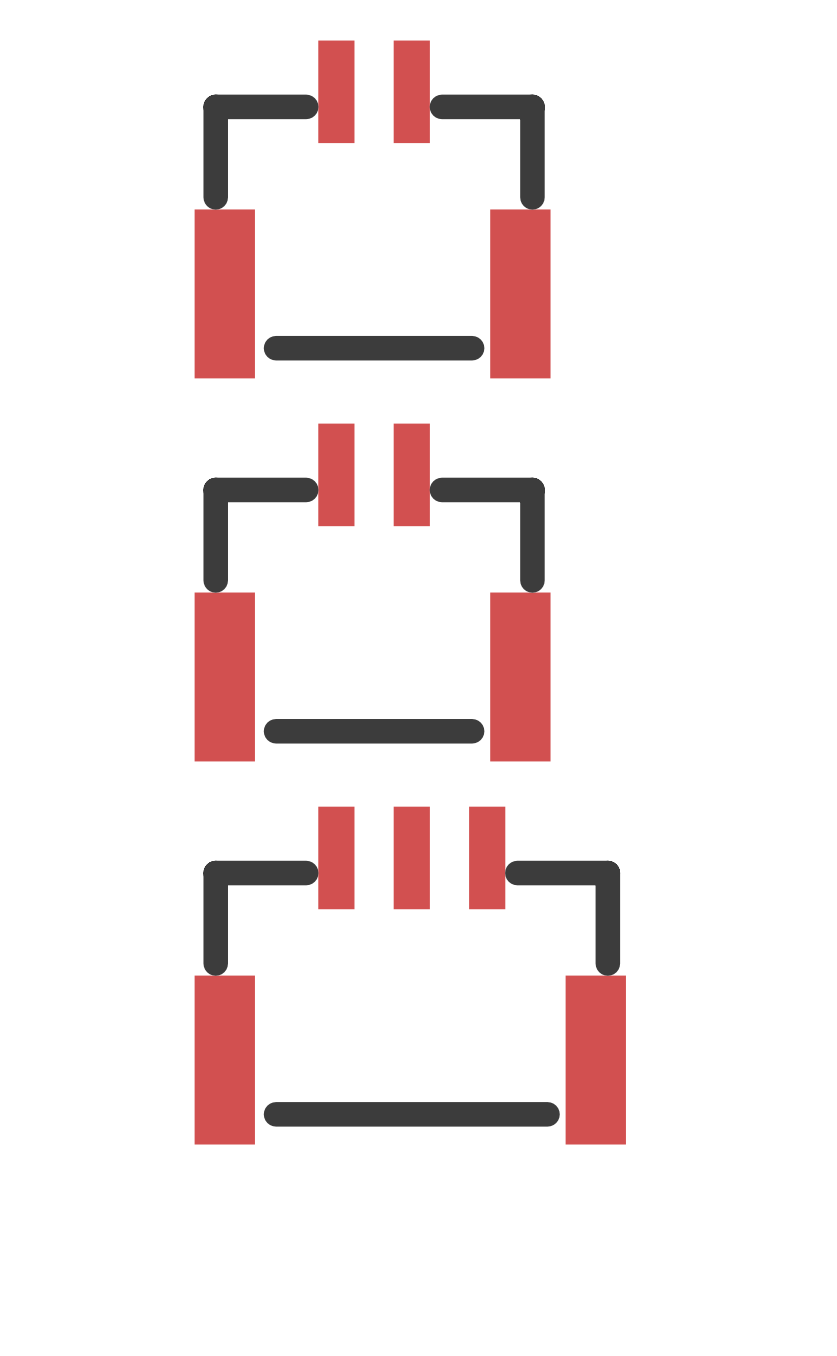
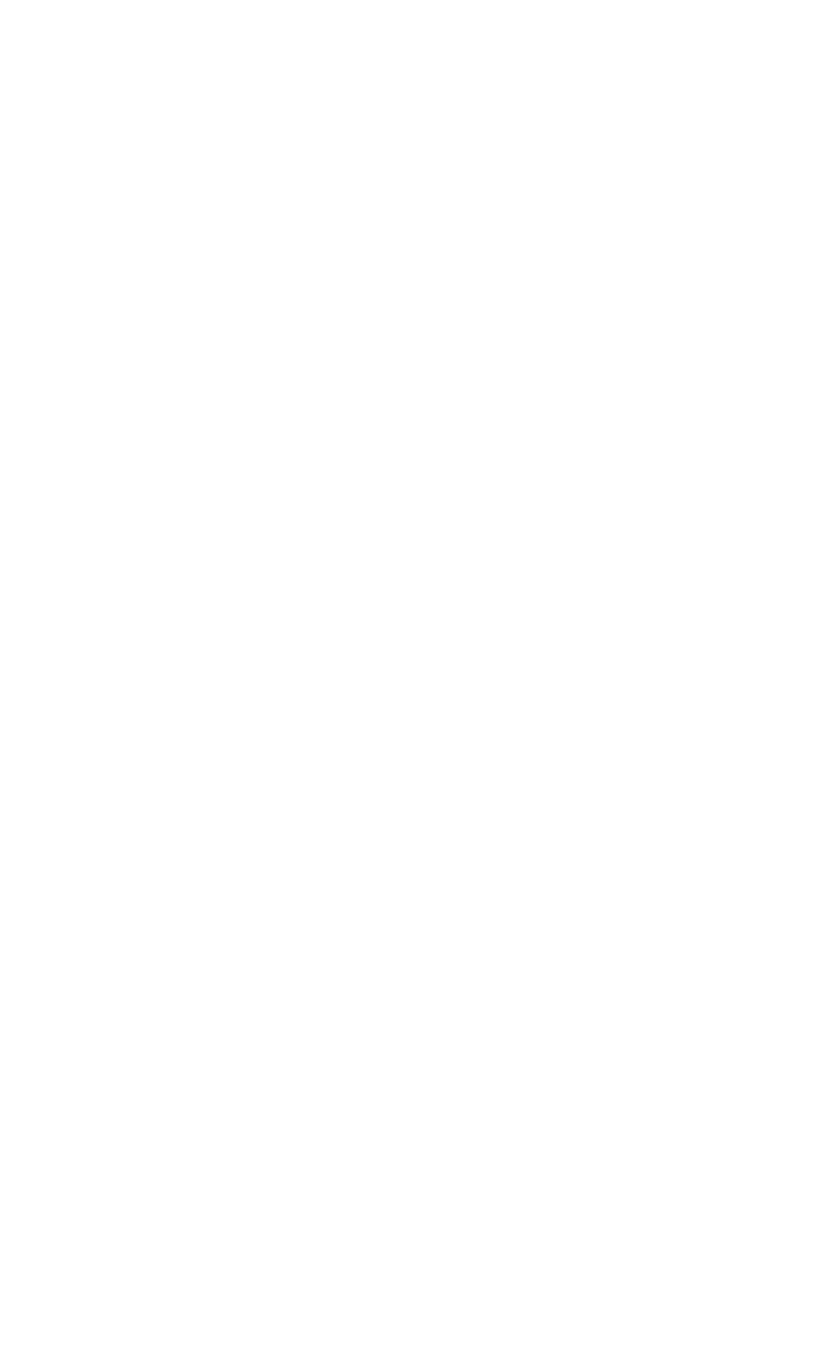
part: (372, 209) -> none
part: (372, 592) -> none
part: (410, 975) -> none

